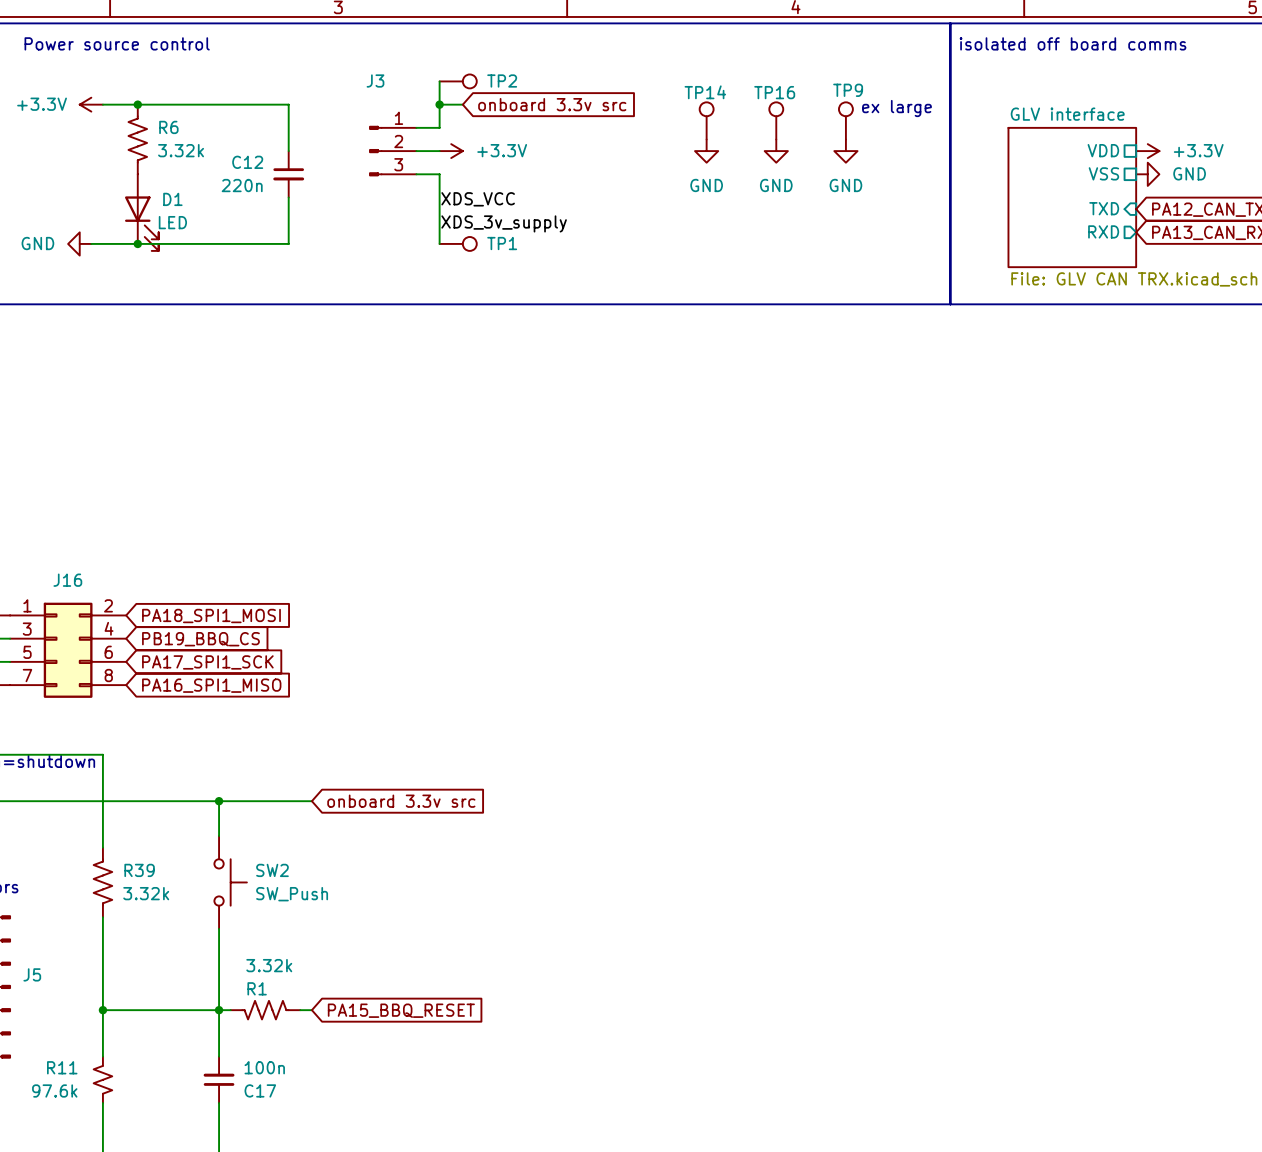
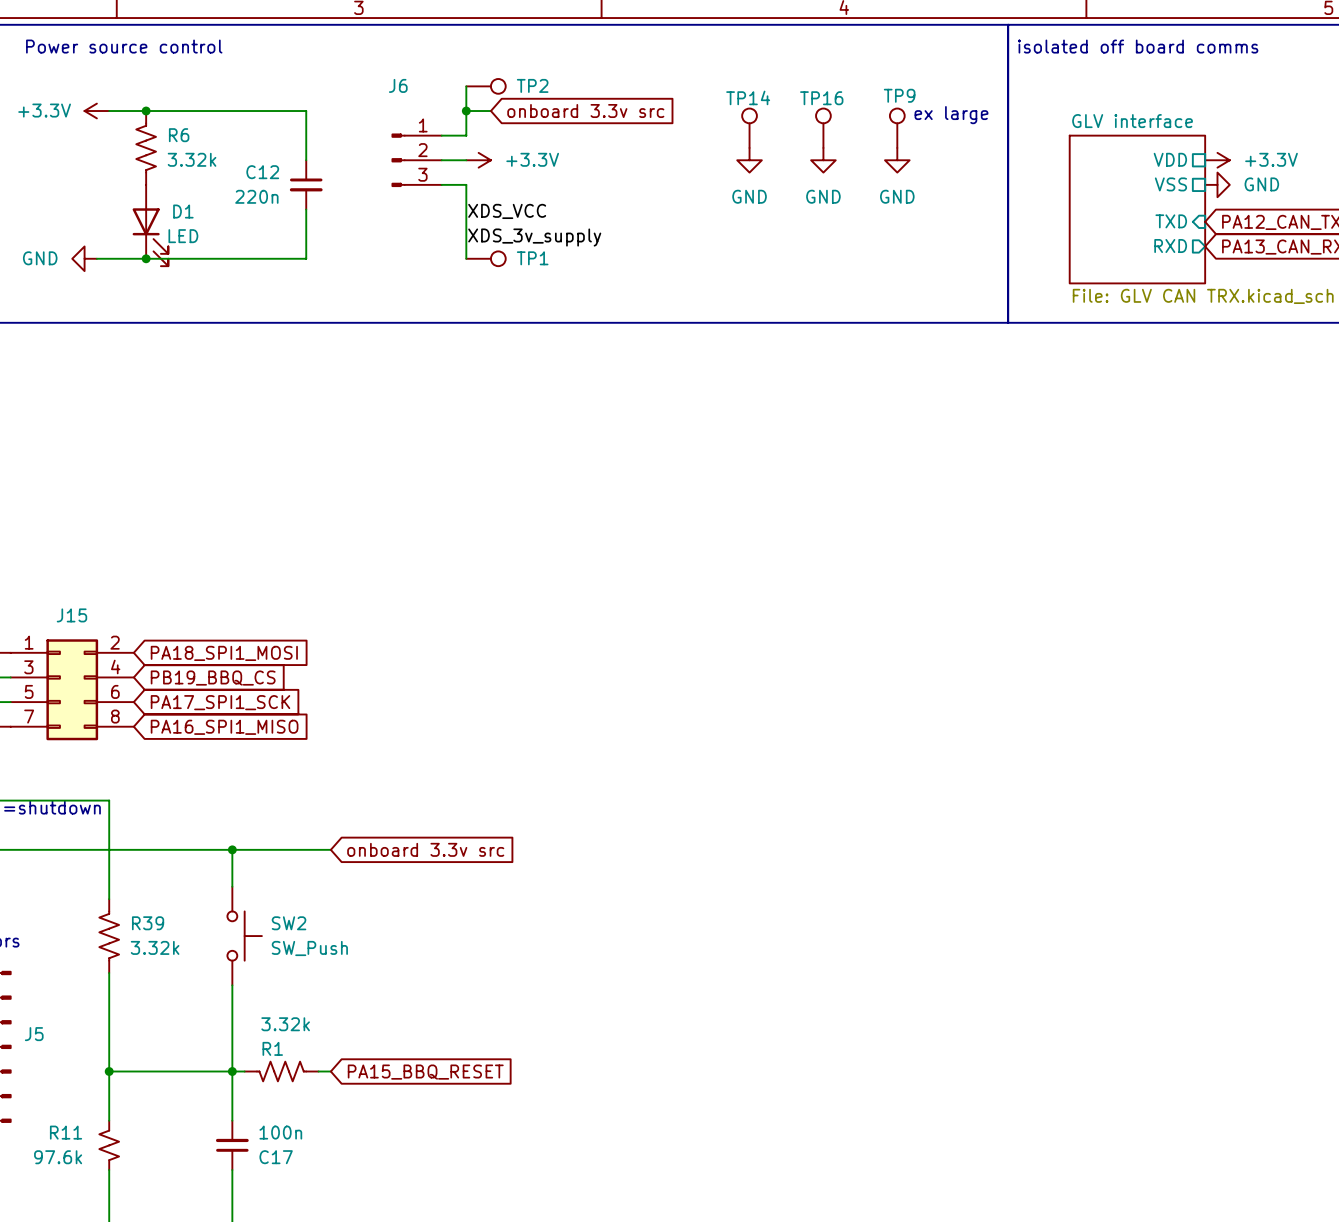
J3 name: J3 (375, 81) -> J6 (398, 85)
J16 name: J16 (67, 580) -> J15 (71, 615)

